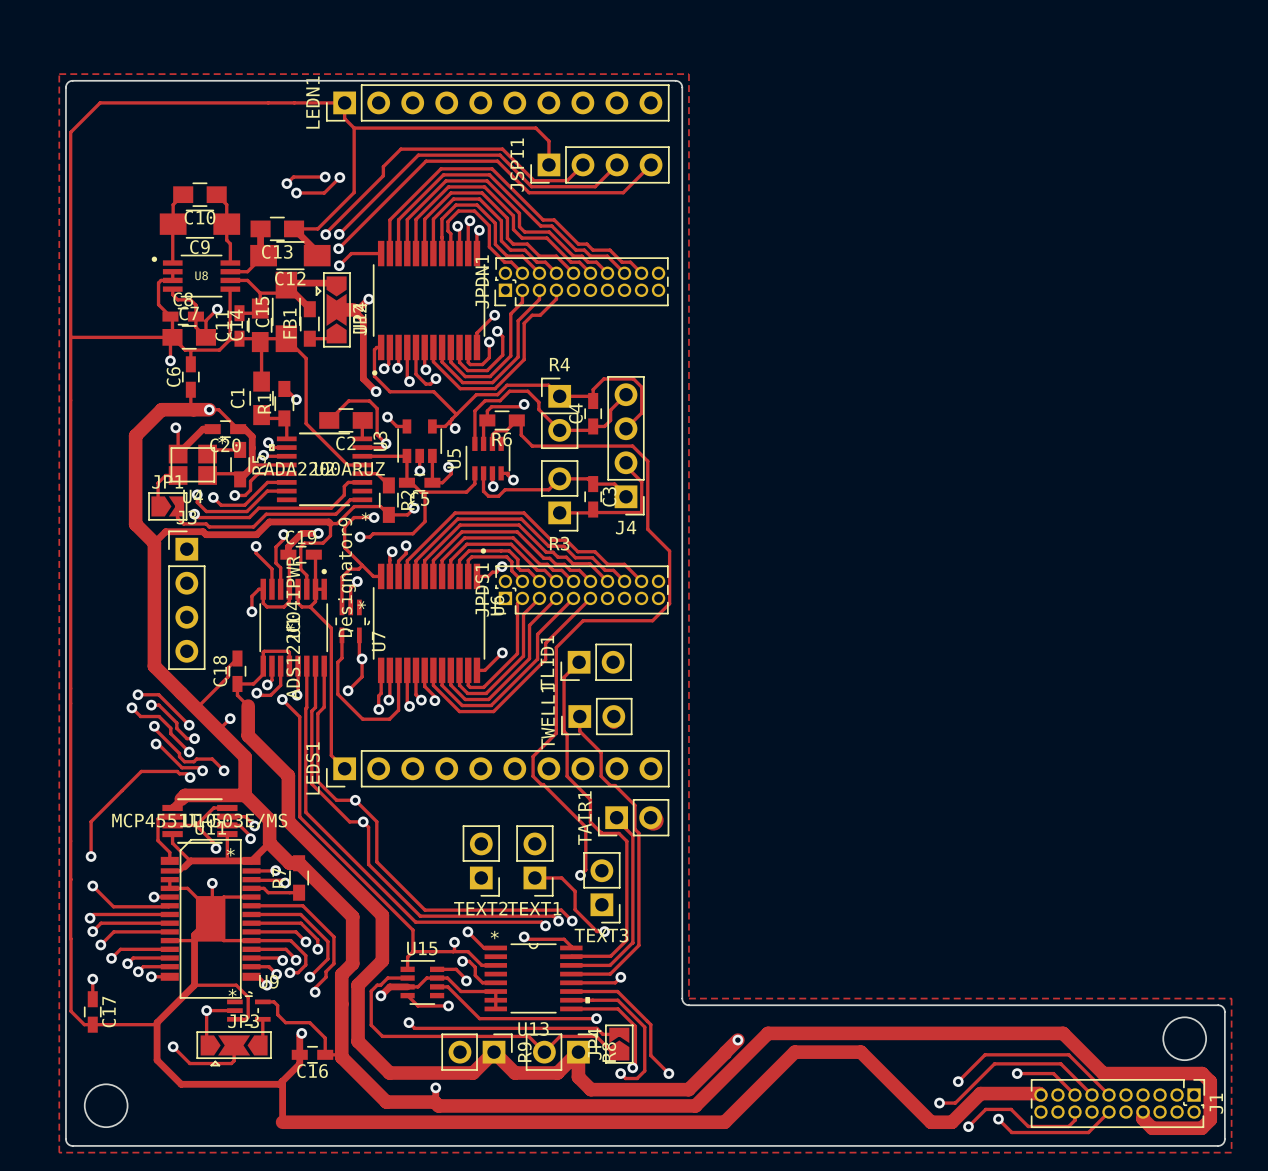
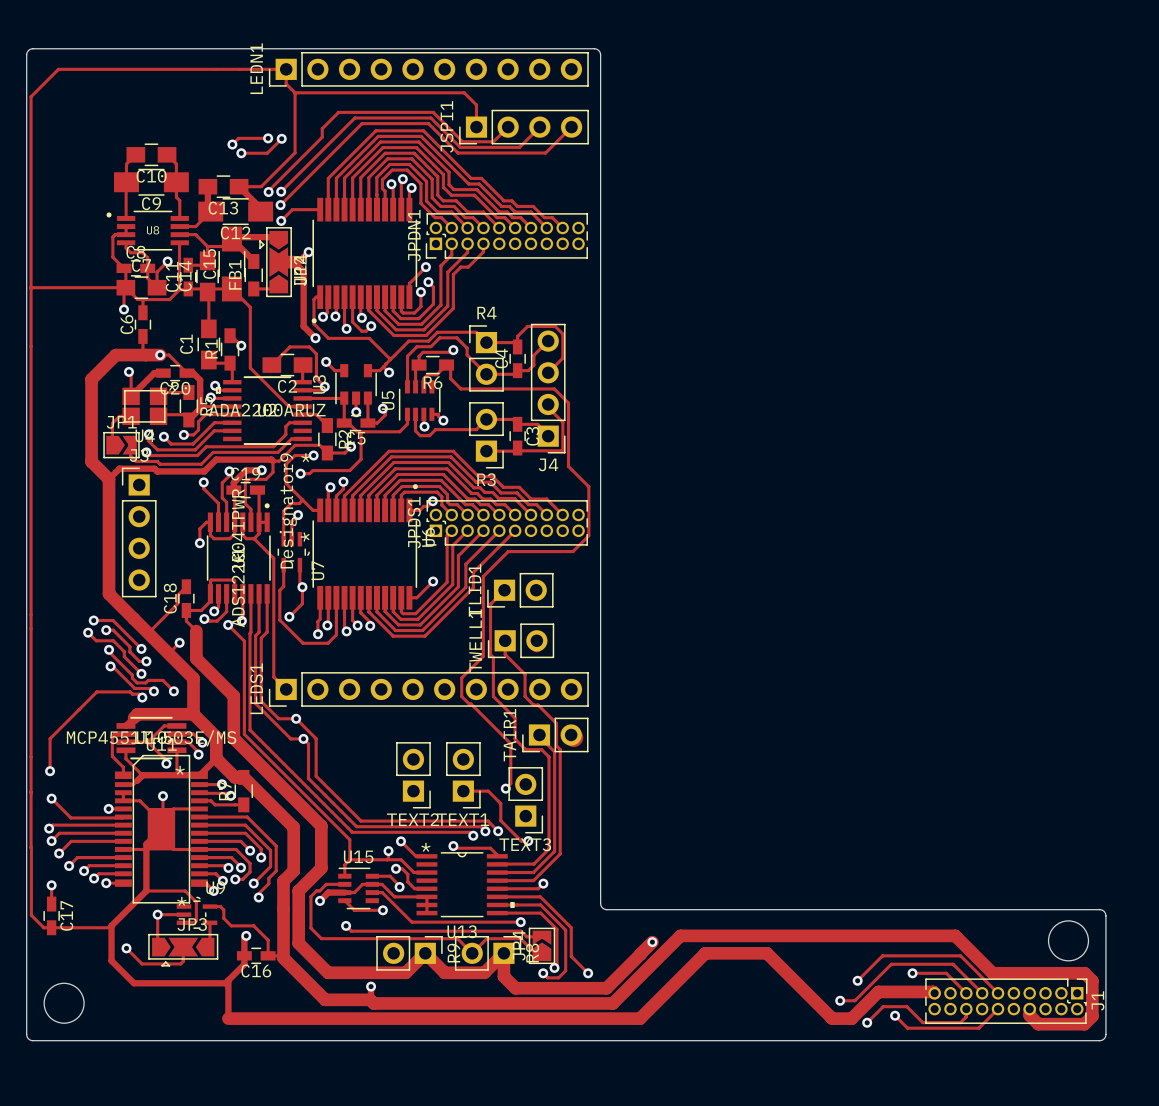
zone outline: (59, 74) (59, 1152) (1231, 1152) (1231, 998) (688, 998) (688, 74) (59, 74) -> none

